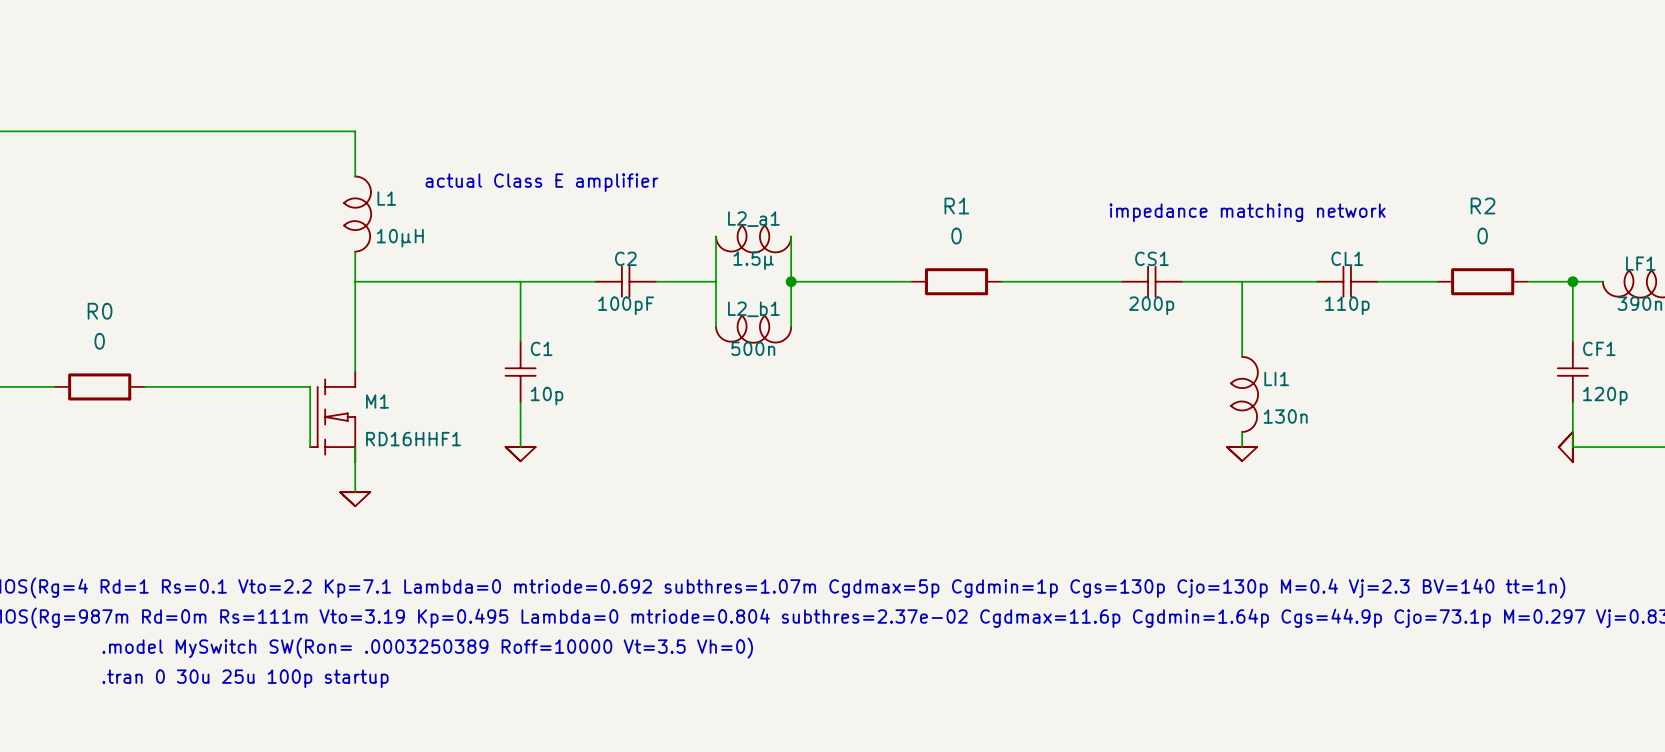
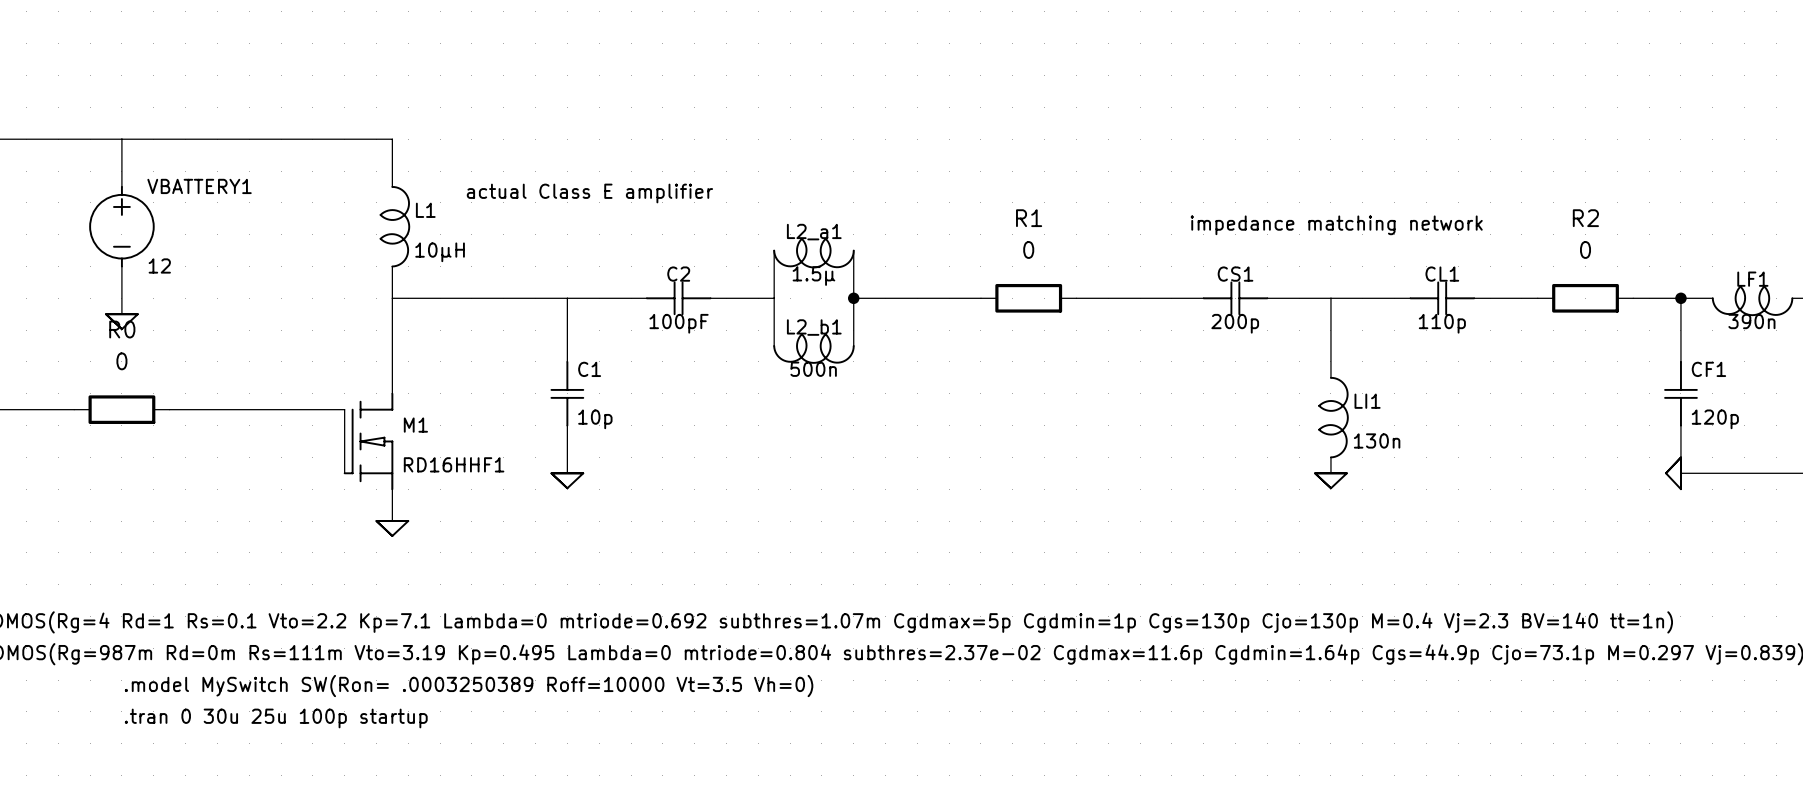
wire: none -> (121, 139) (121, 186)
VBATTERY1: none -> 12 (121, 226)
wire: none -> (121, 266) (121, 314)
power symbol: none -> (121, 321)

